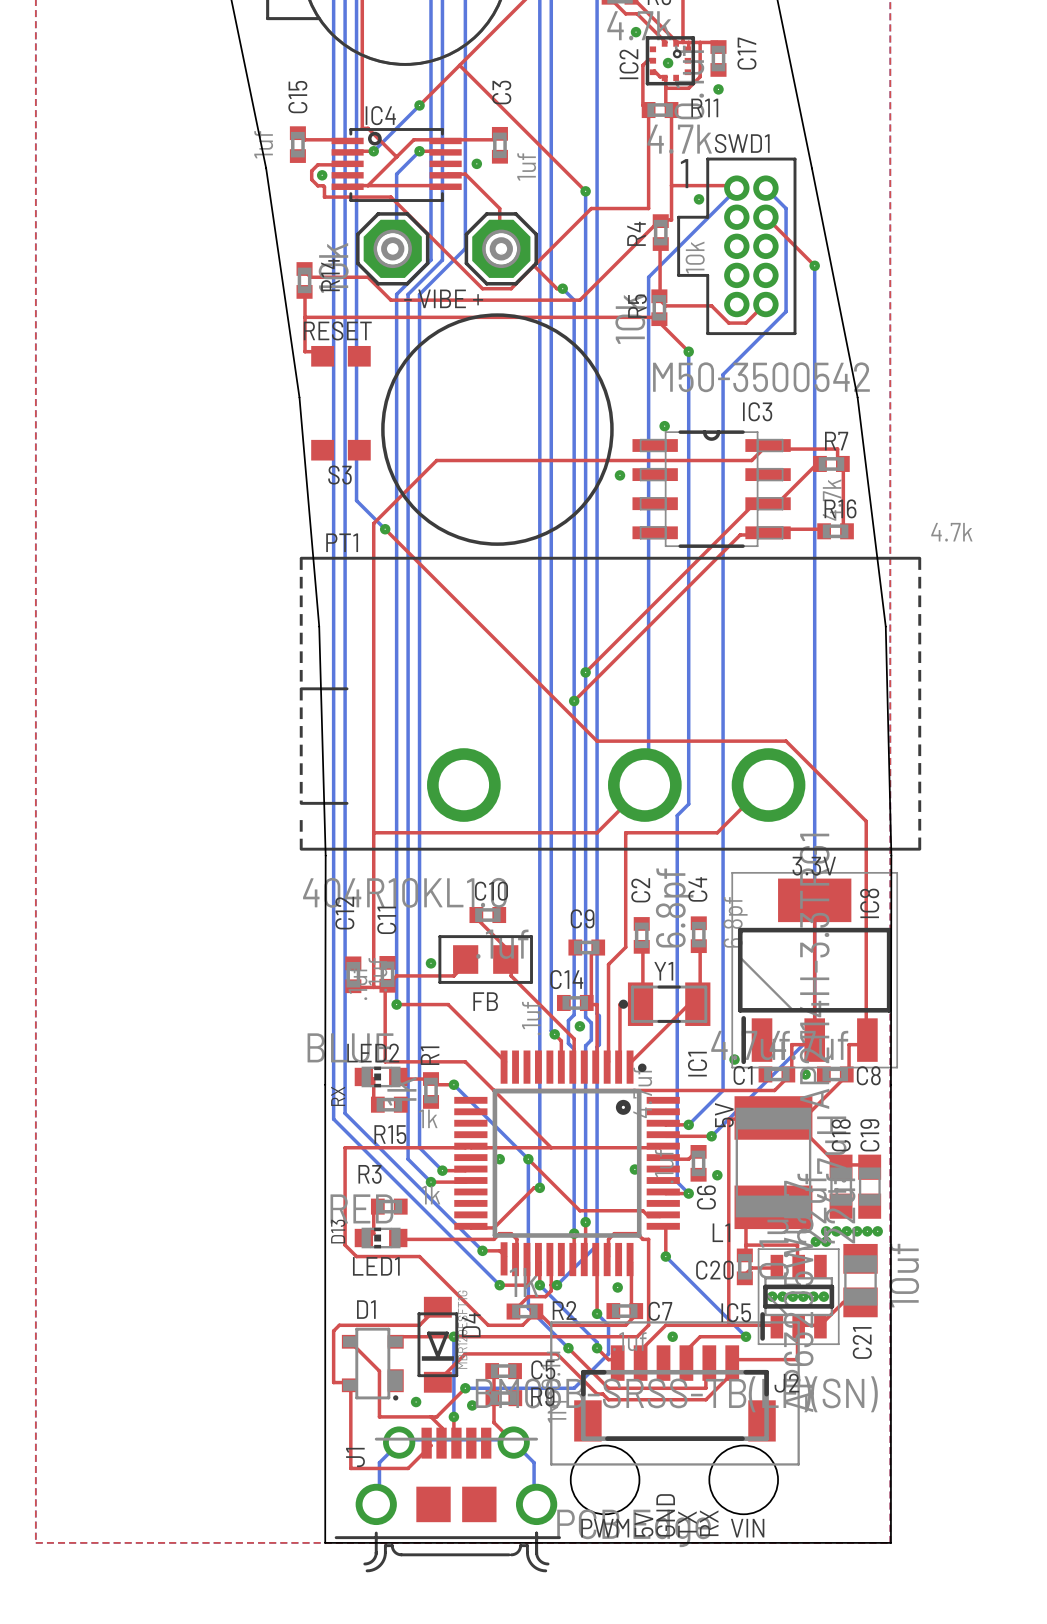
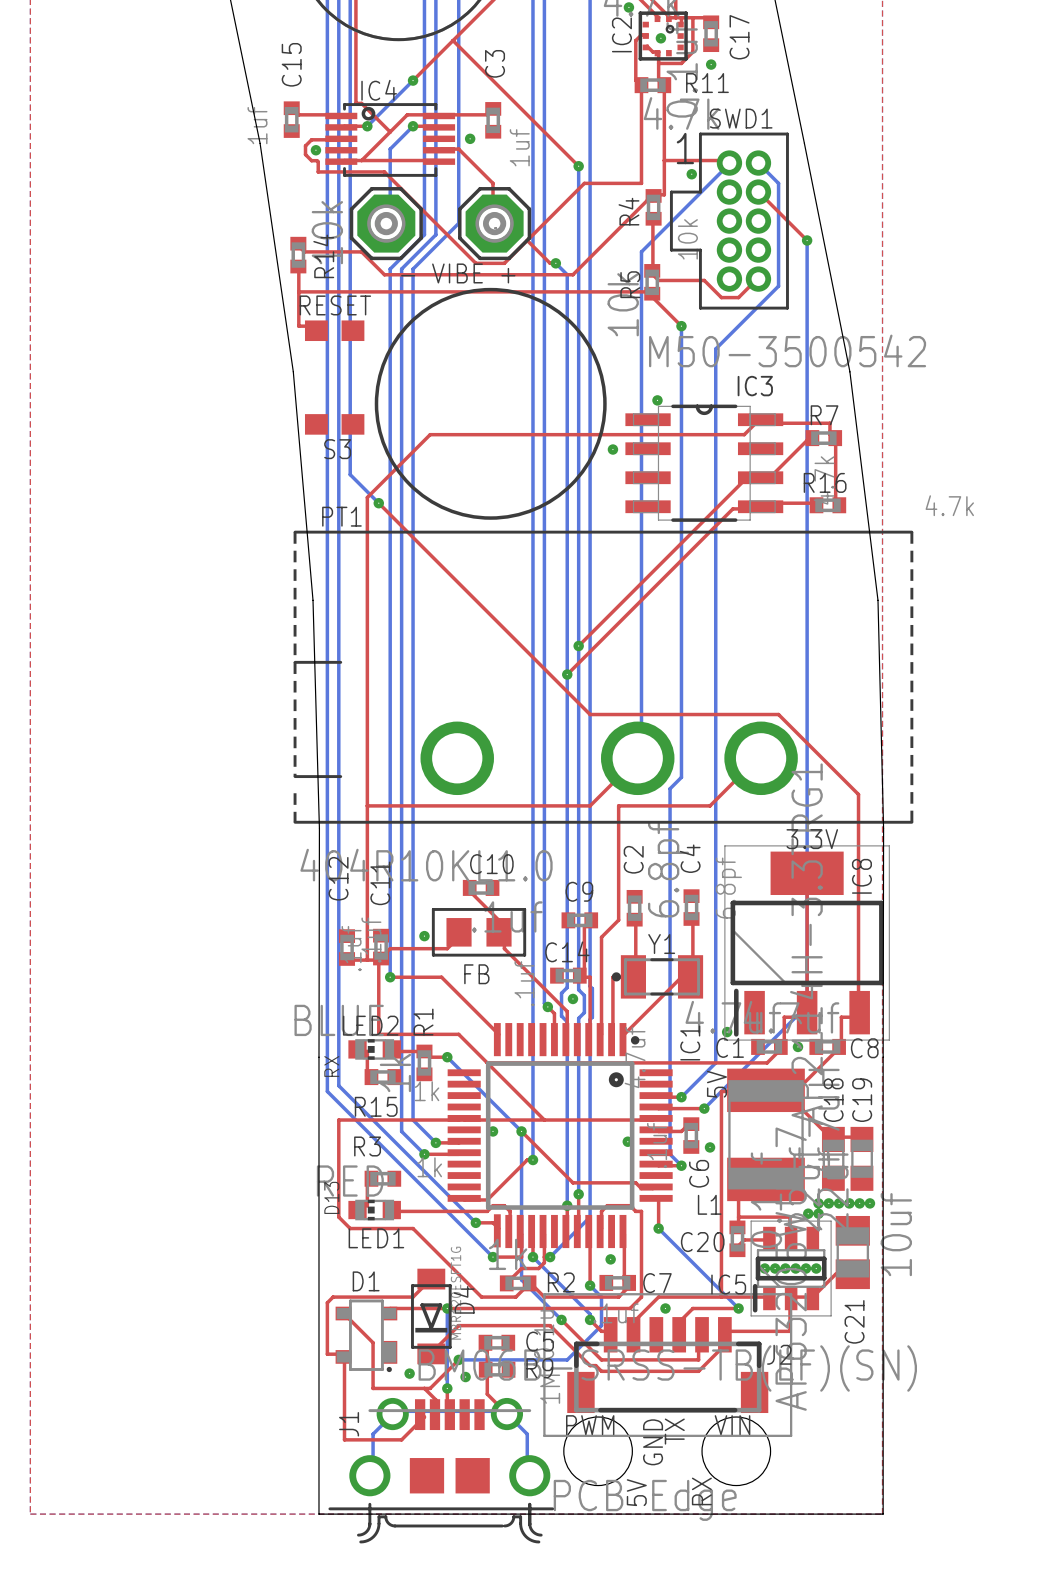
text position: GND (665, 1515) -> GND (653, 1442)
text position: TX (687, 1524) -> TX (674, 1431)
text position: PWM (605, 1528) -> PWM (590, 1425)
text position: VIN (747, 1528) -> VIN (732, 1425)

